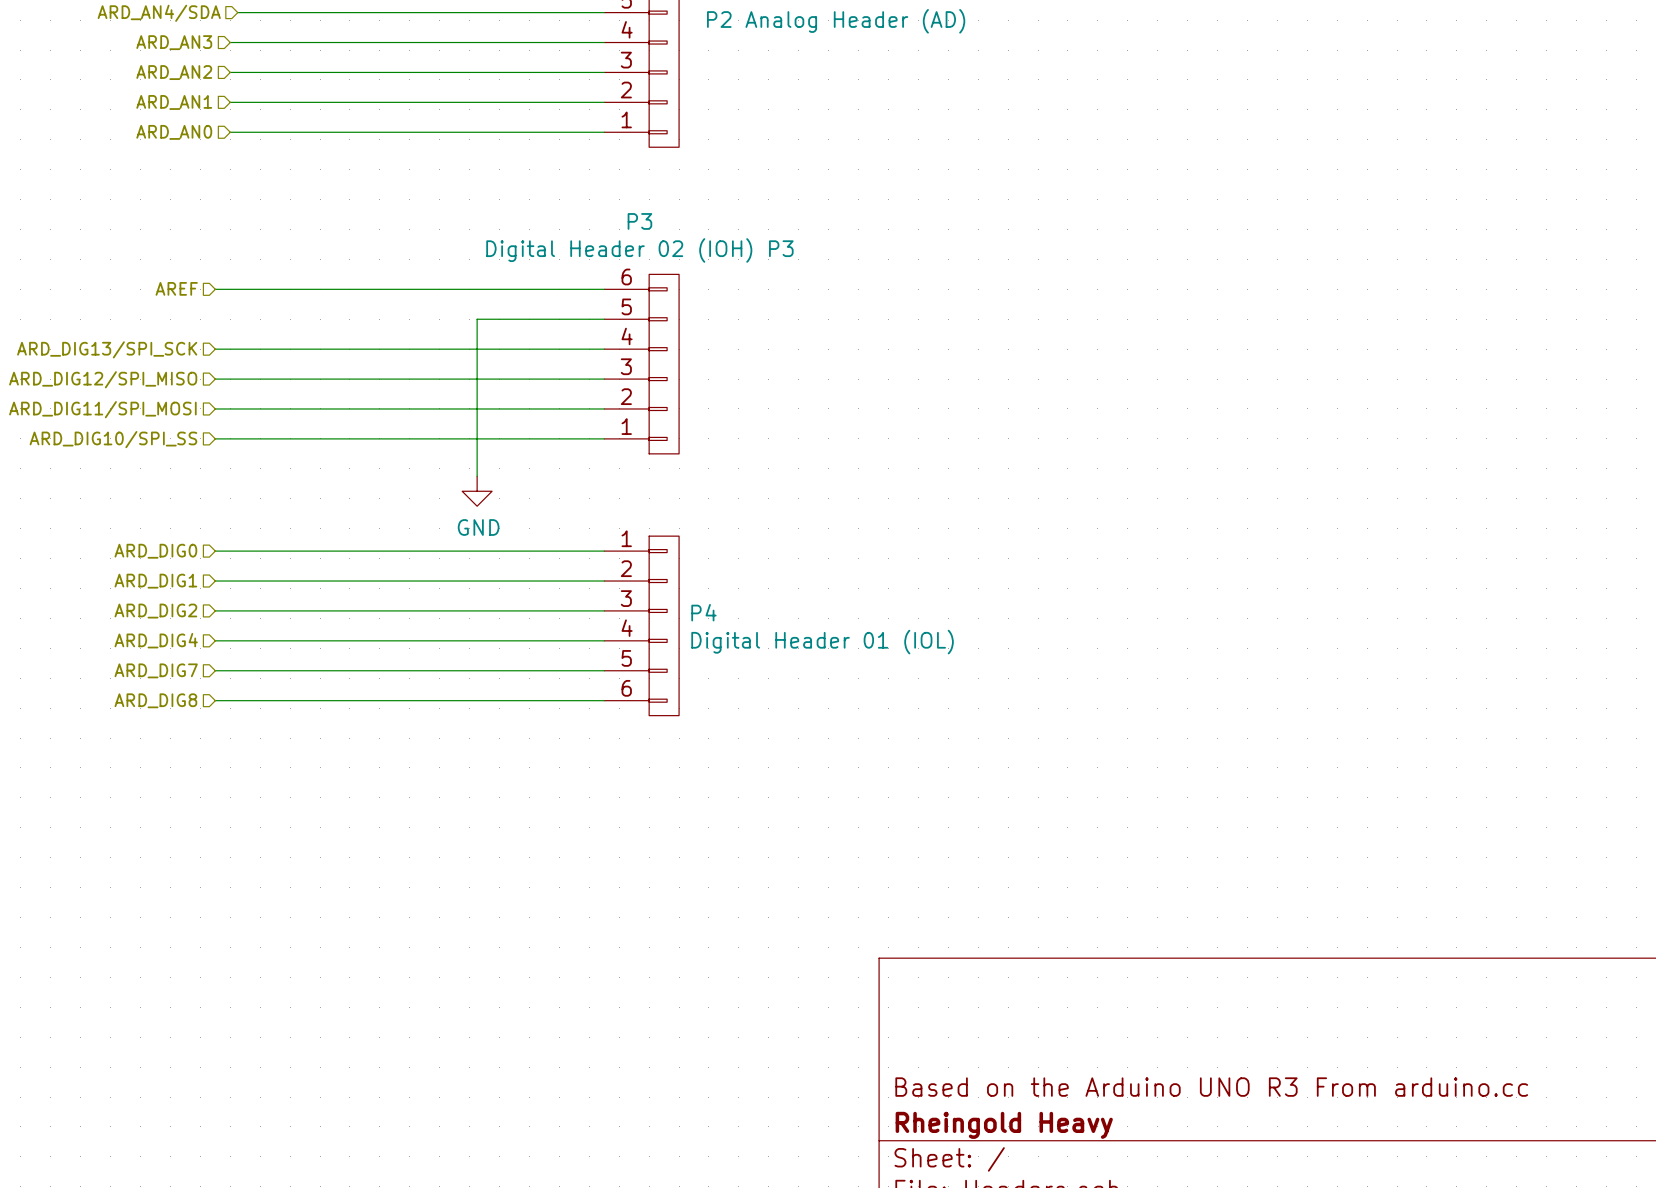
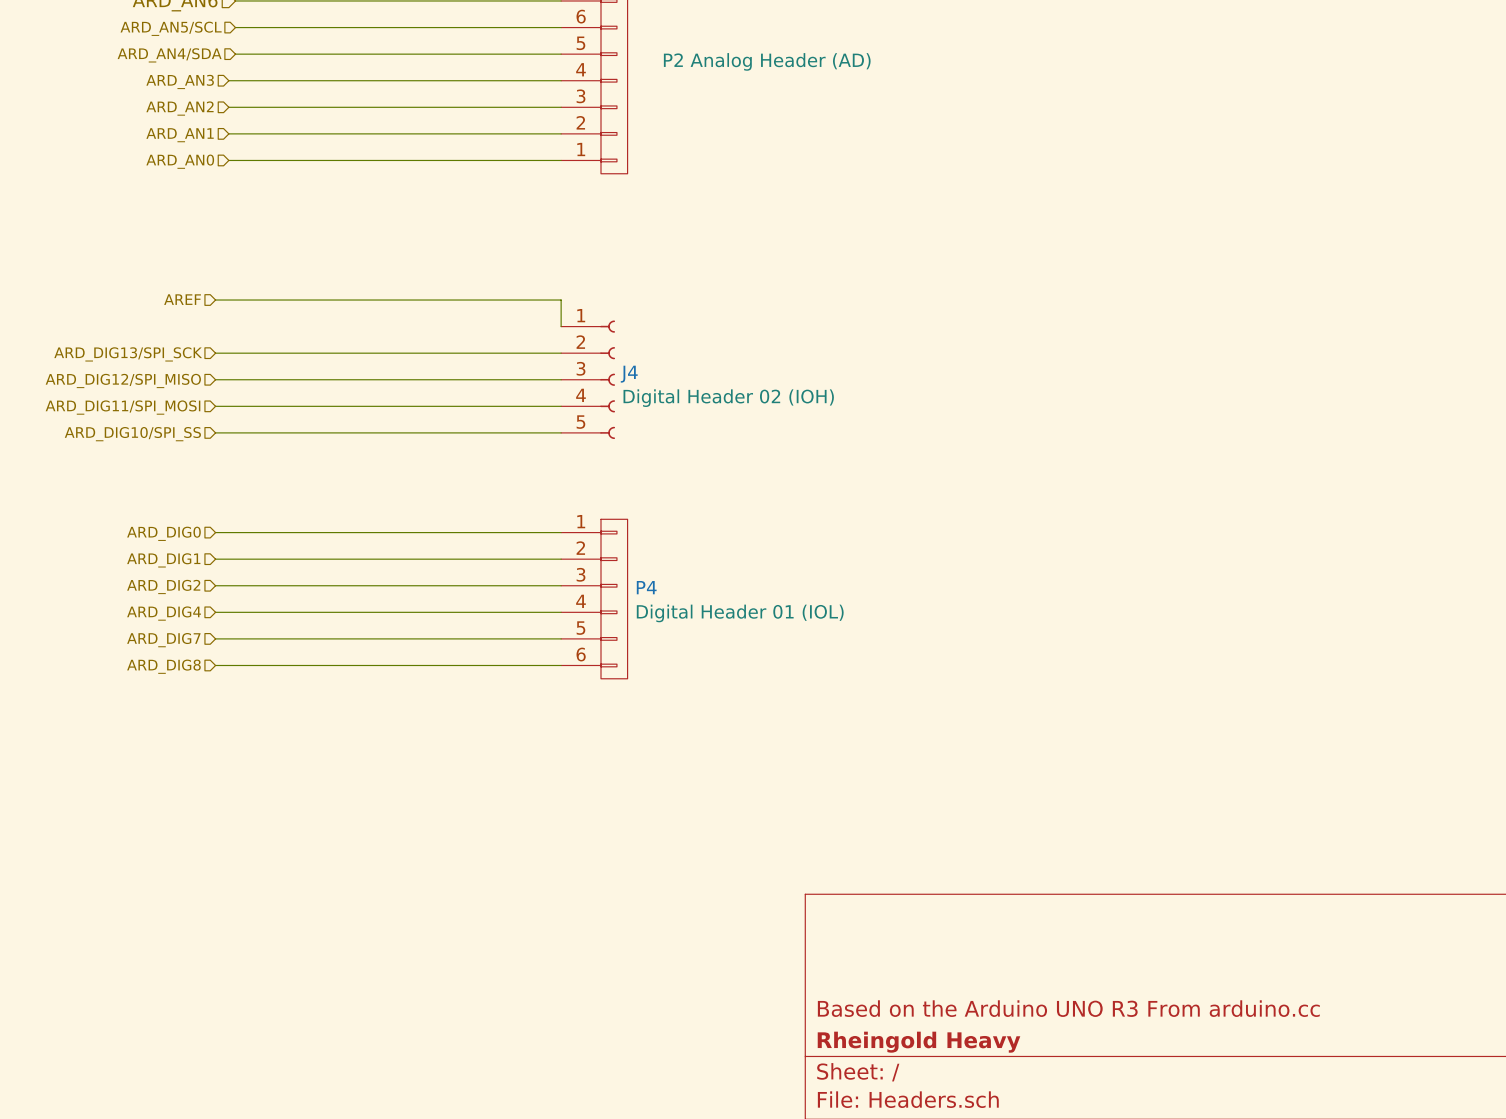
wire: (604, 319) (477, 319) (477, 476) -> (561, 326) (561, 300)
P3: Digital Header 02 (IOH) P3 (641, 364) -> none
J4: none -> Digital Header 02 (IOH) (588, 379)
power symbol: GND (477, 491) -> none

